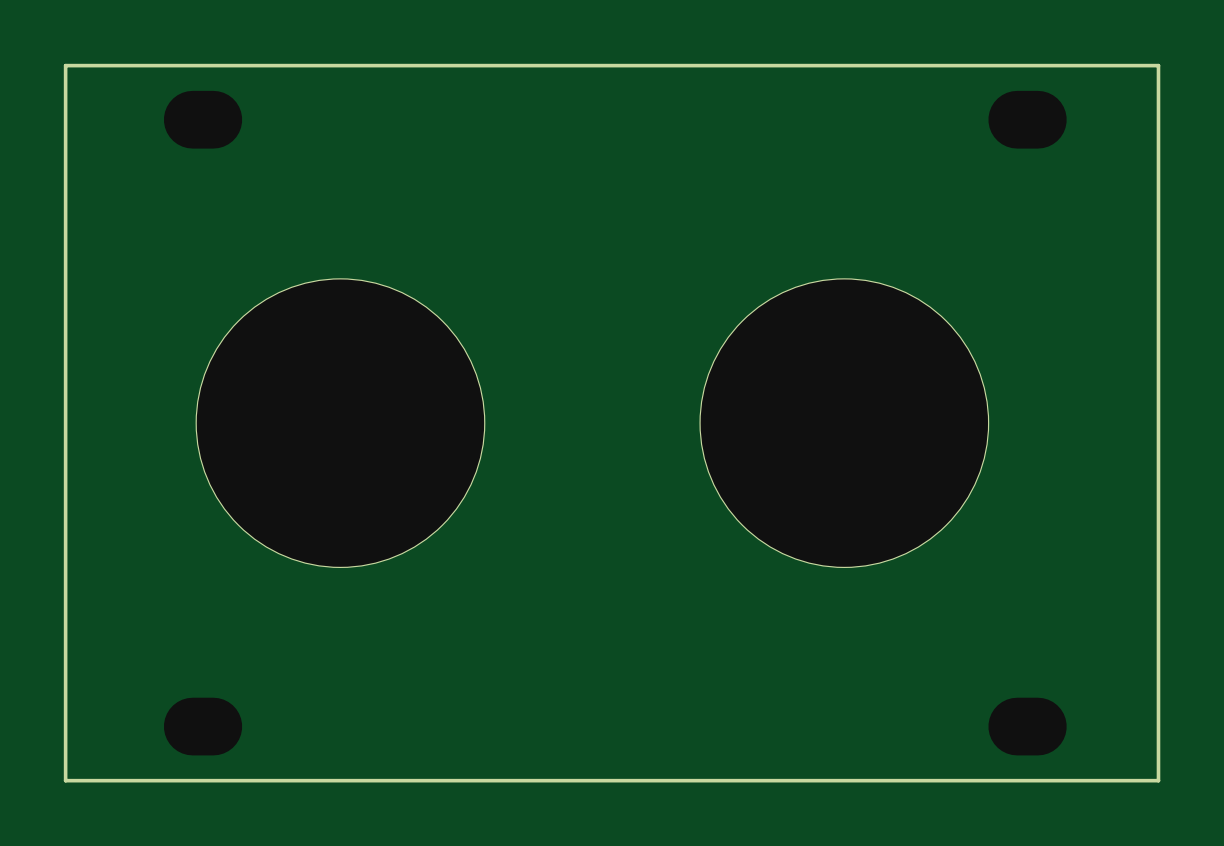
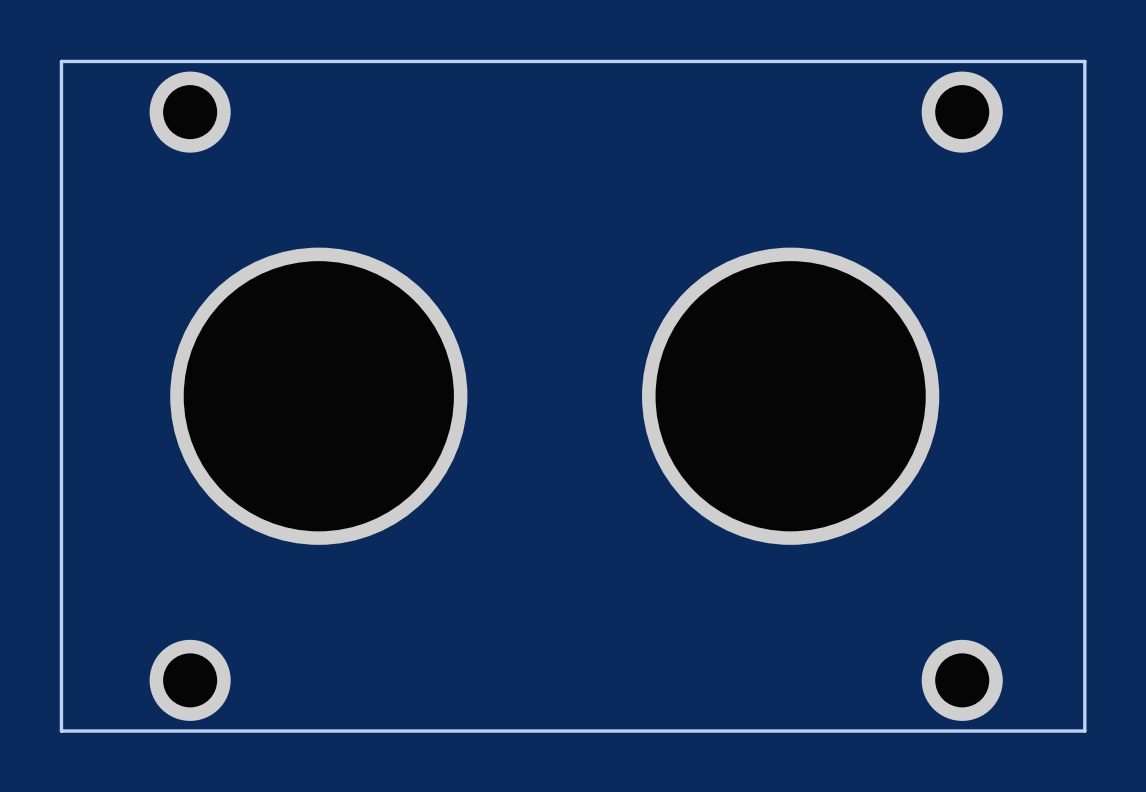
part footprint: [163, 90, 243, 149] -> [149, 71, 231, 153]
part footprint: [988, 90, 1067, 149] -> [921, 71, 1003, 153]
part footprint: [196, 278, 485, 568] -> [170, 247, 468, 545]
part footprint: [700, 278, 989, 568] -> [642, 247, 940, 545]
part footprint: [163, 697, 243, 756] -> [149, 639, 231, 721]
part footprint: [988, 697, 1067, 756] -> [921, 639, 1003, 721]

